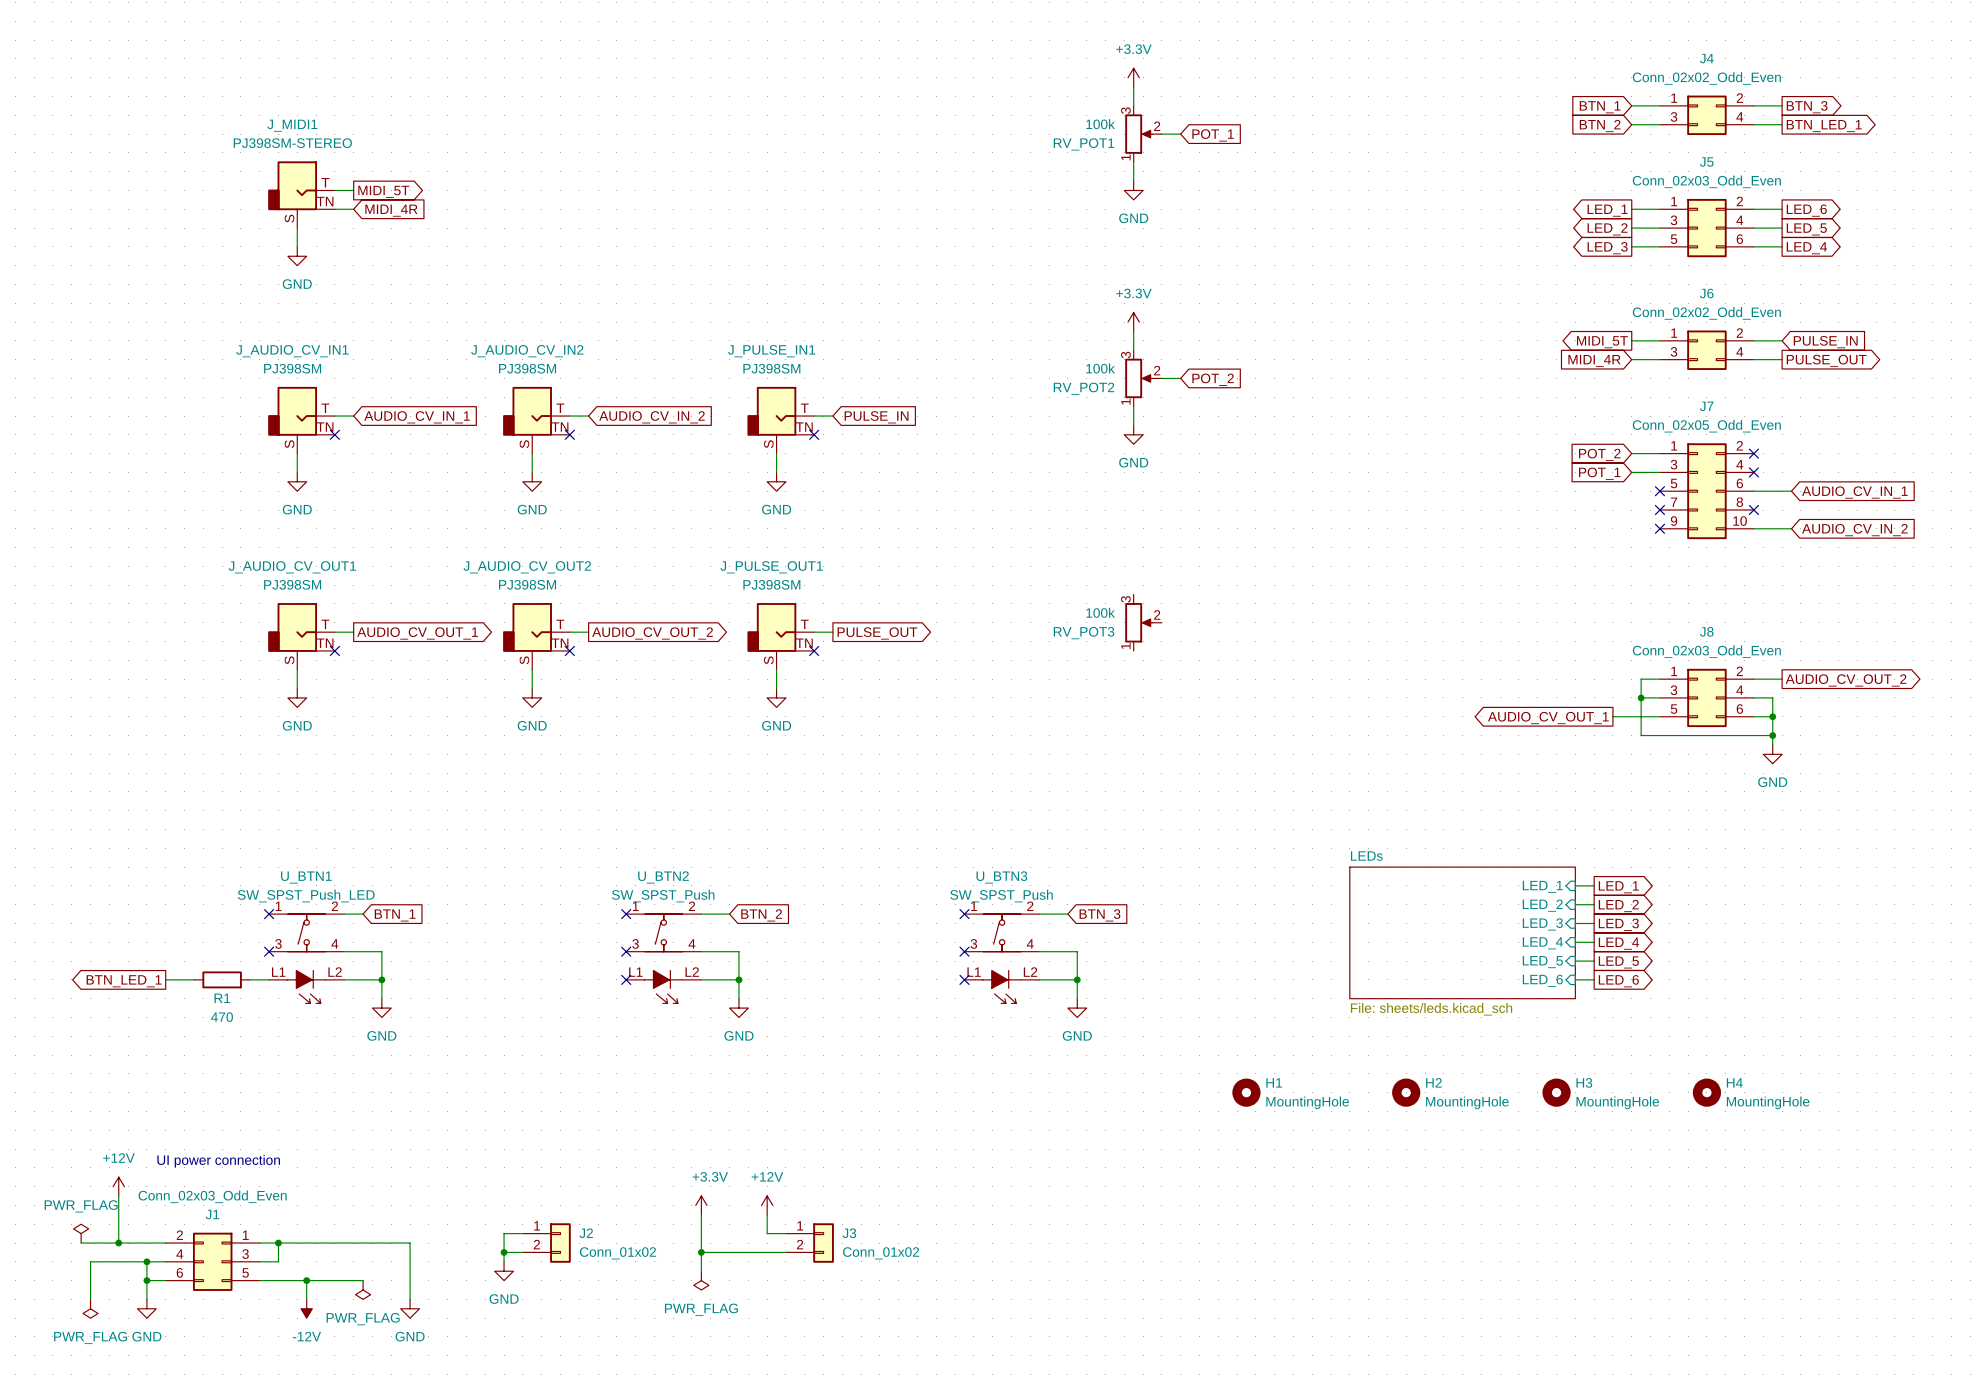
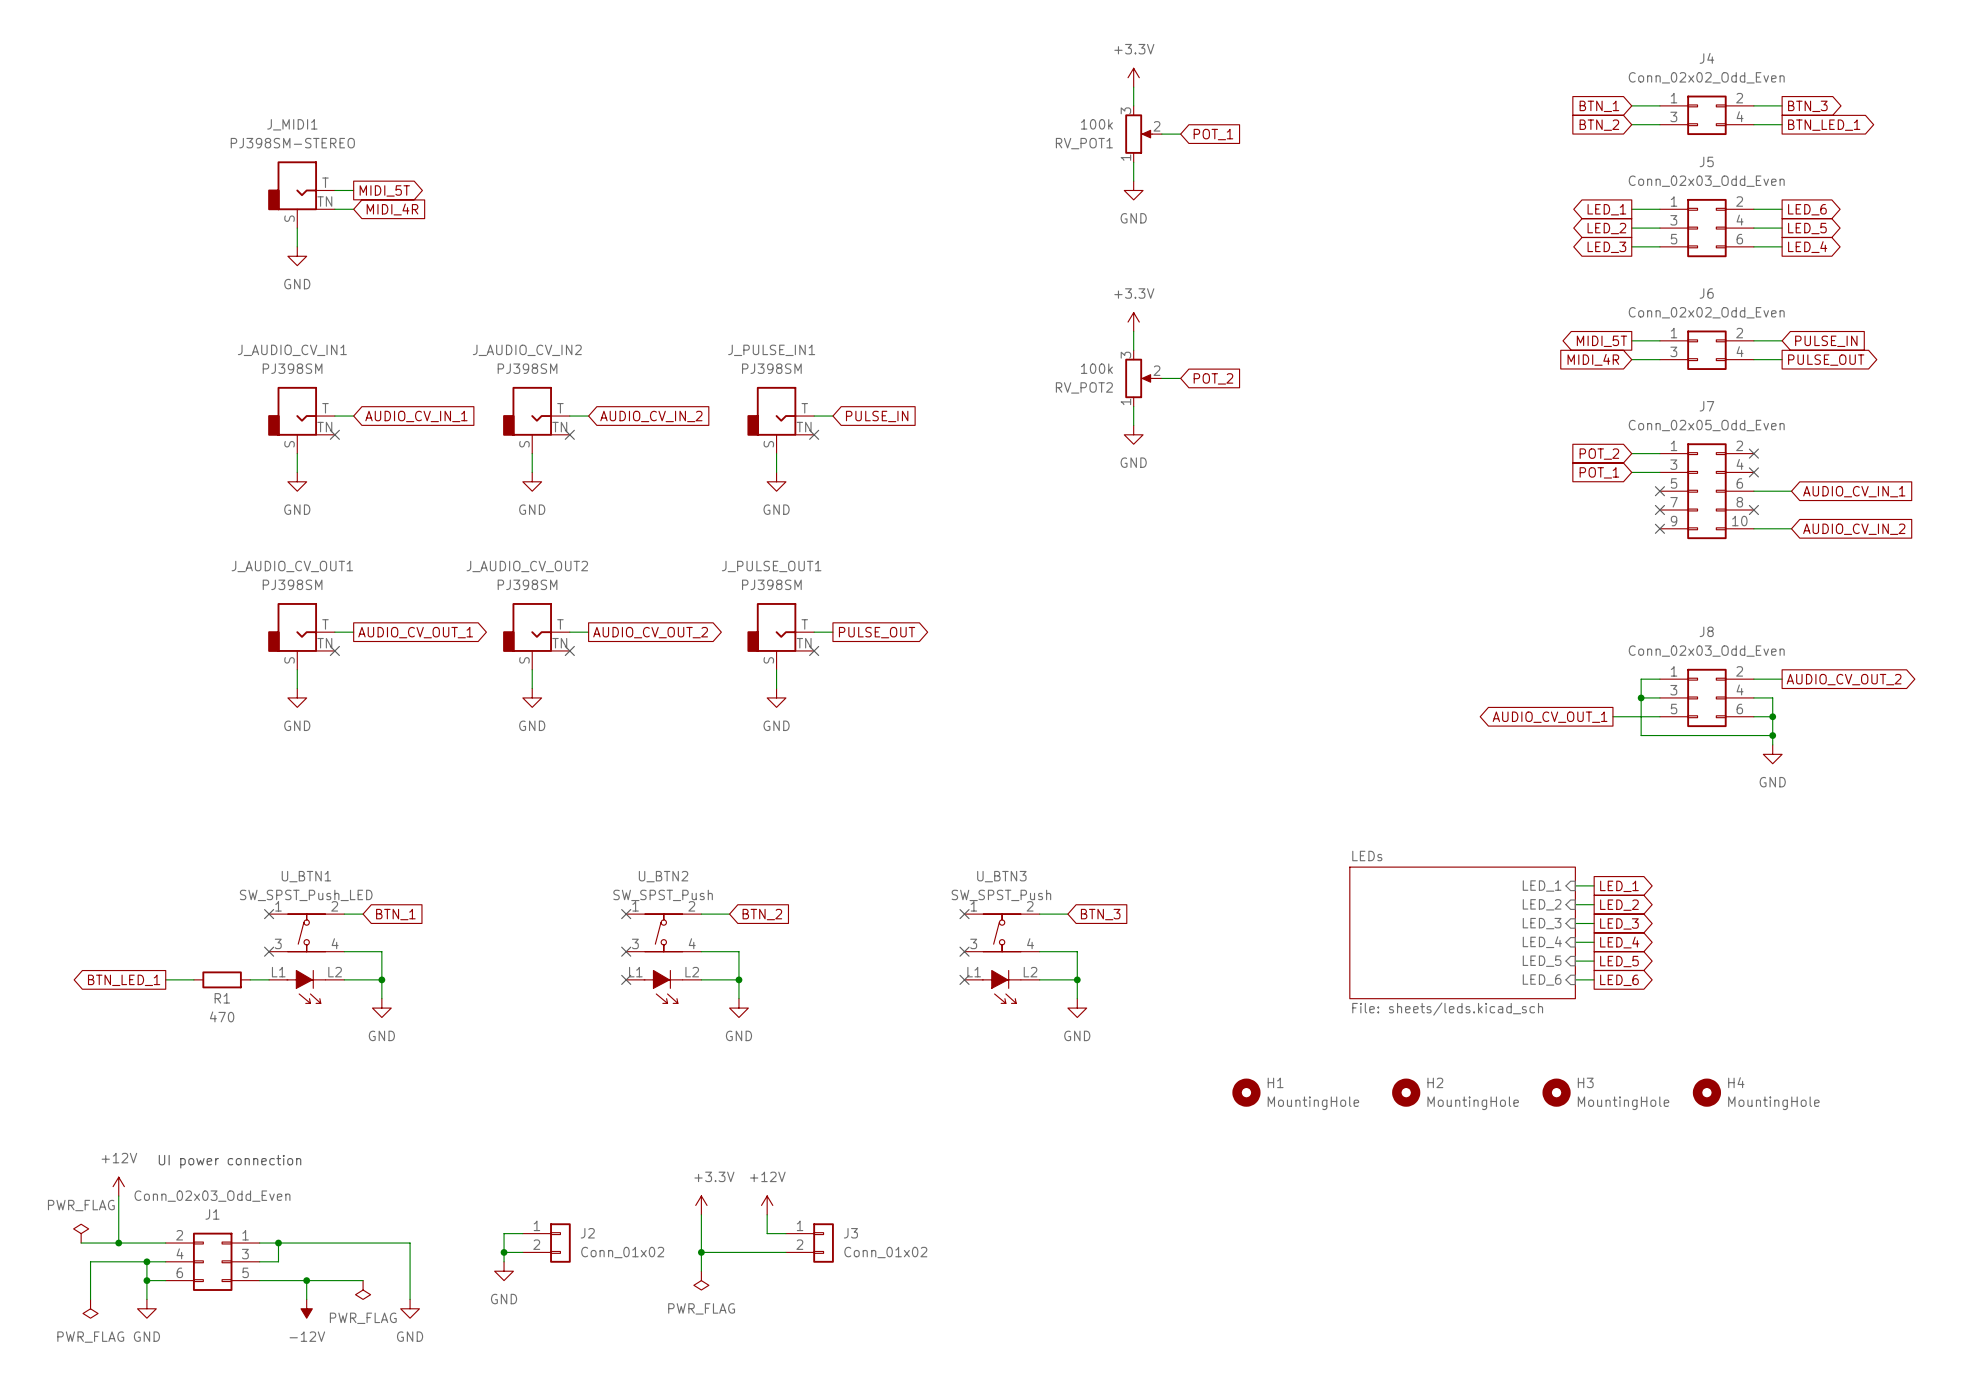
RV_POT3: 100k (1143, 622) -> none

